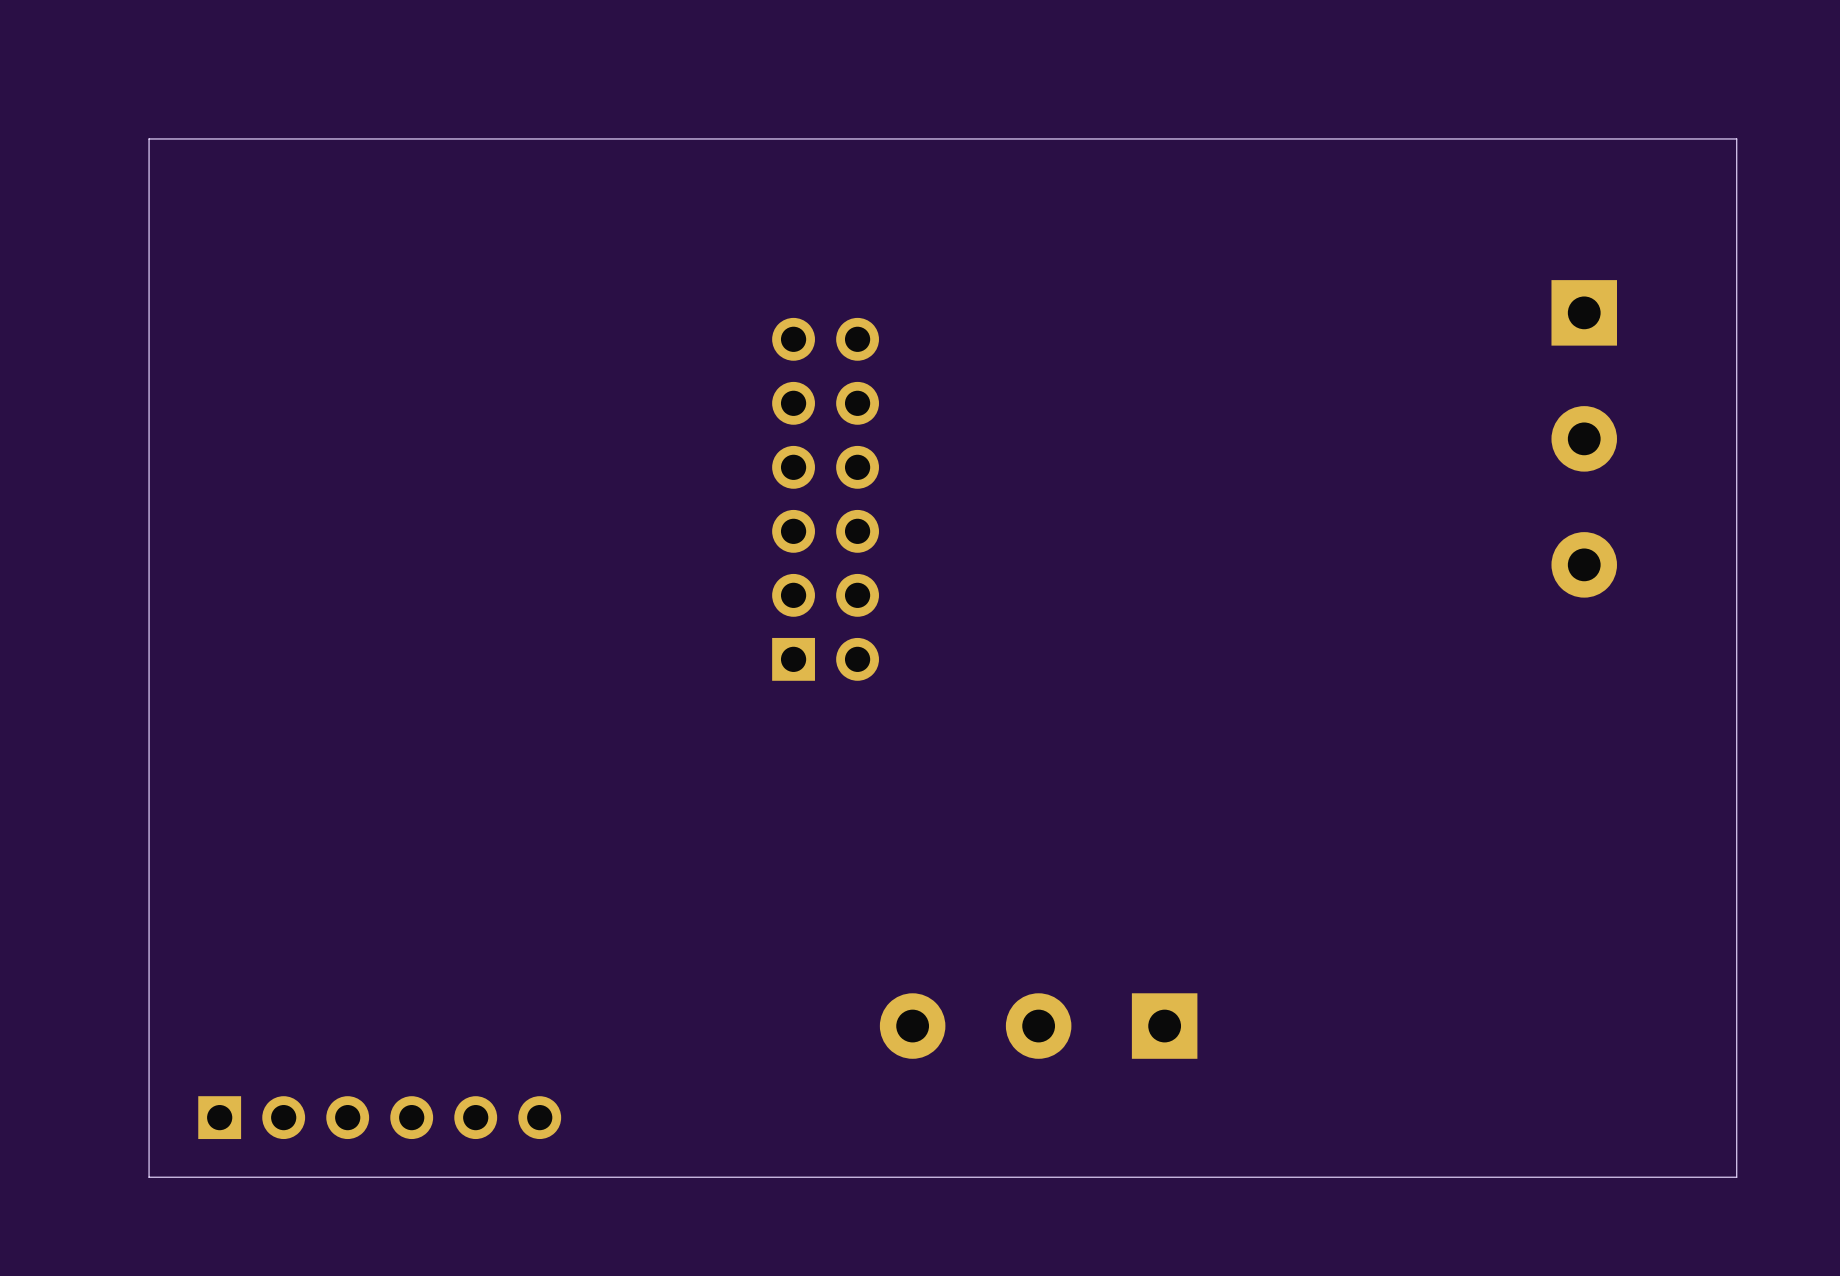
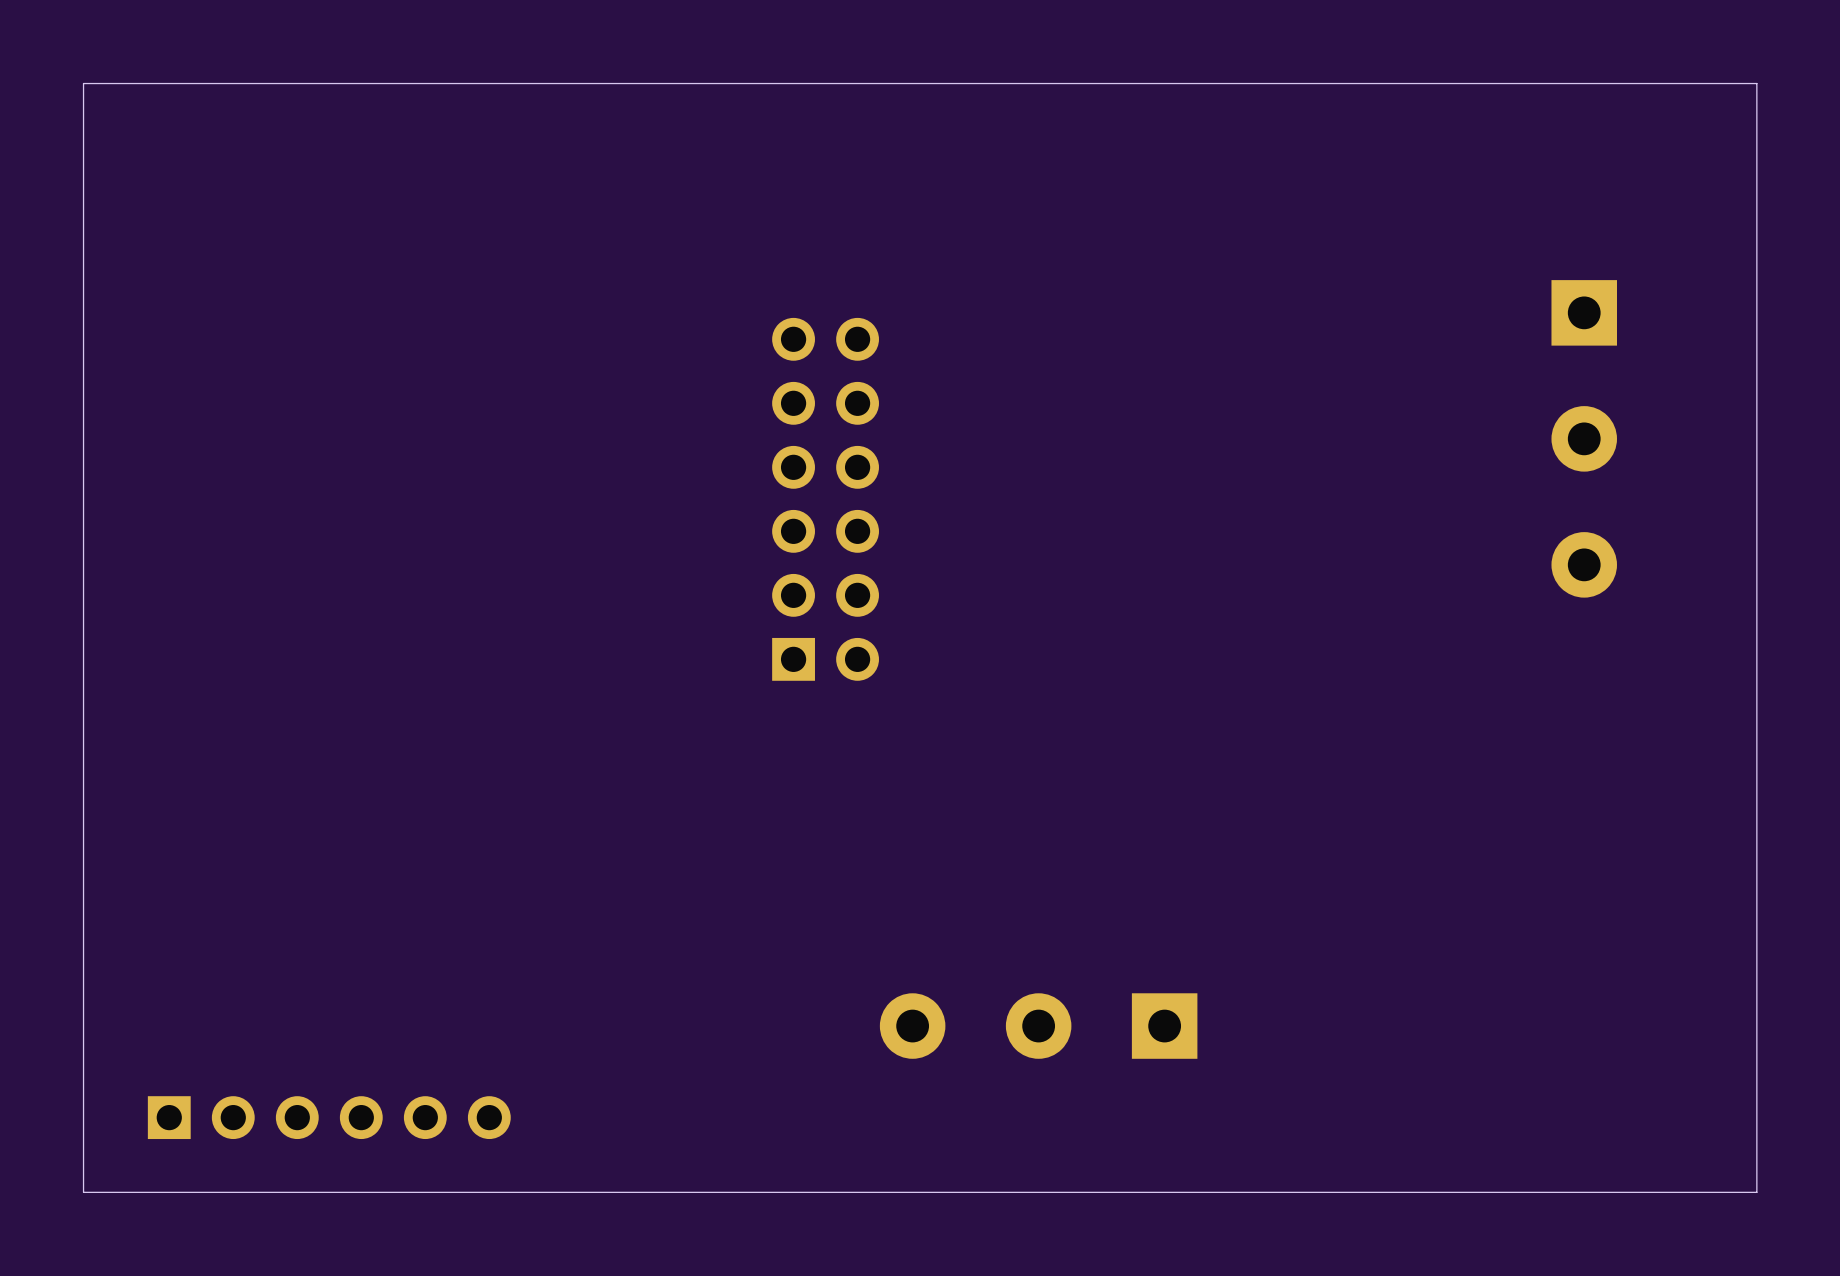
board edge: (1736, 138) (149, 138) (149, 1177) (1736, 1177) (1736, 138) -> (1756, 83) (1756, 1192) (83, 1192) (83, 83) (1756, 83)
part position: (379, 1117) -> (329, 1117)

